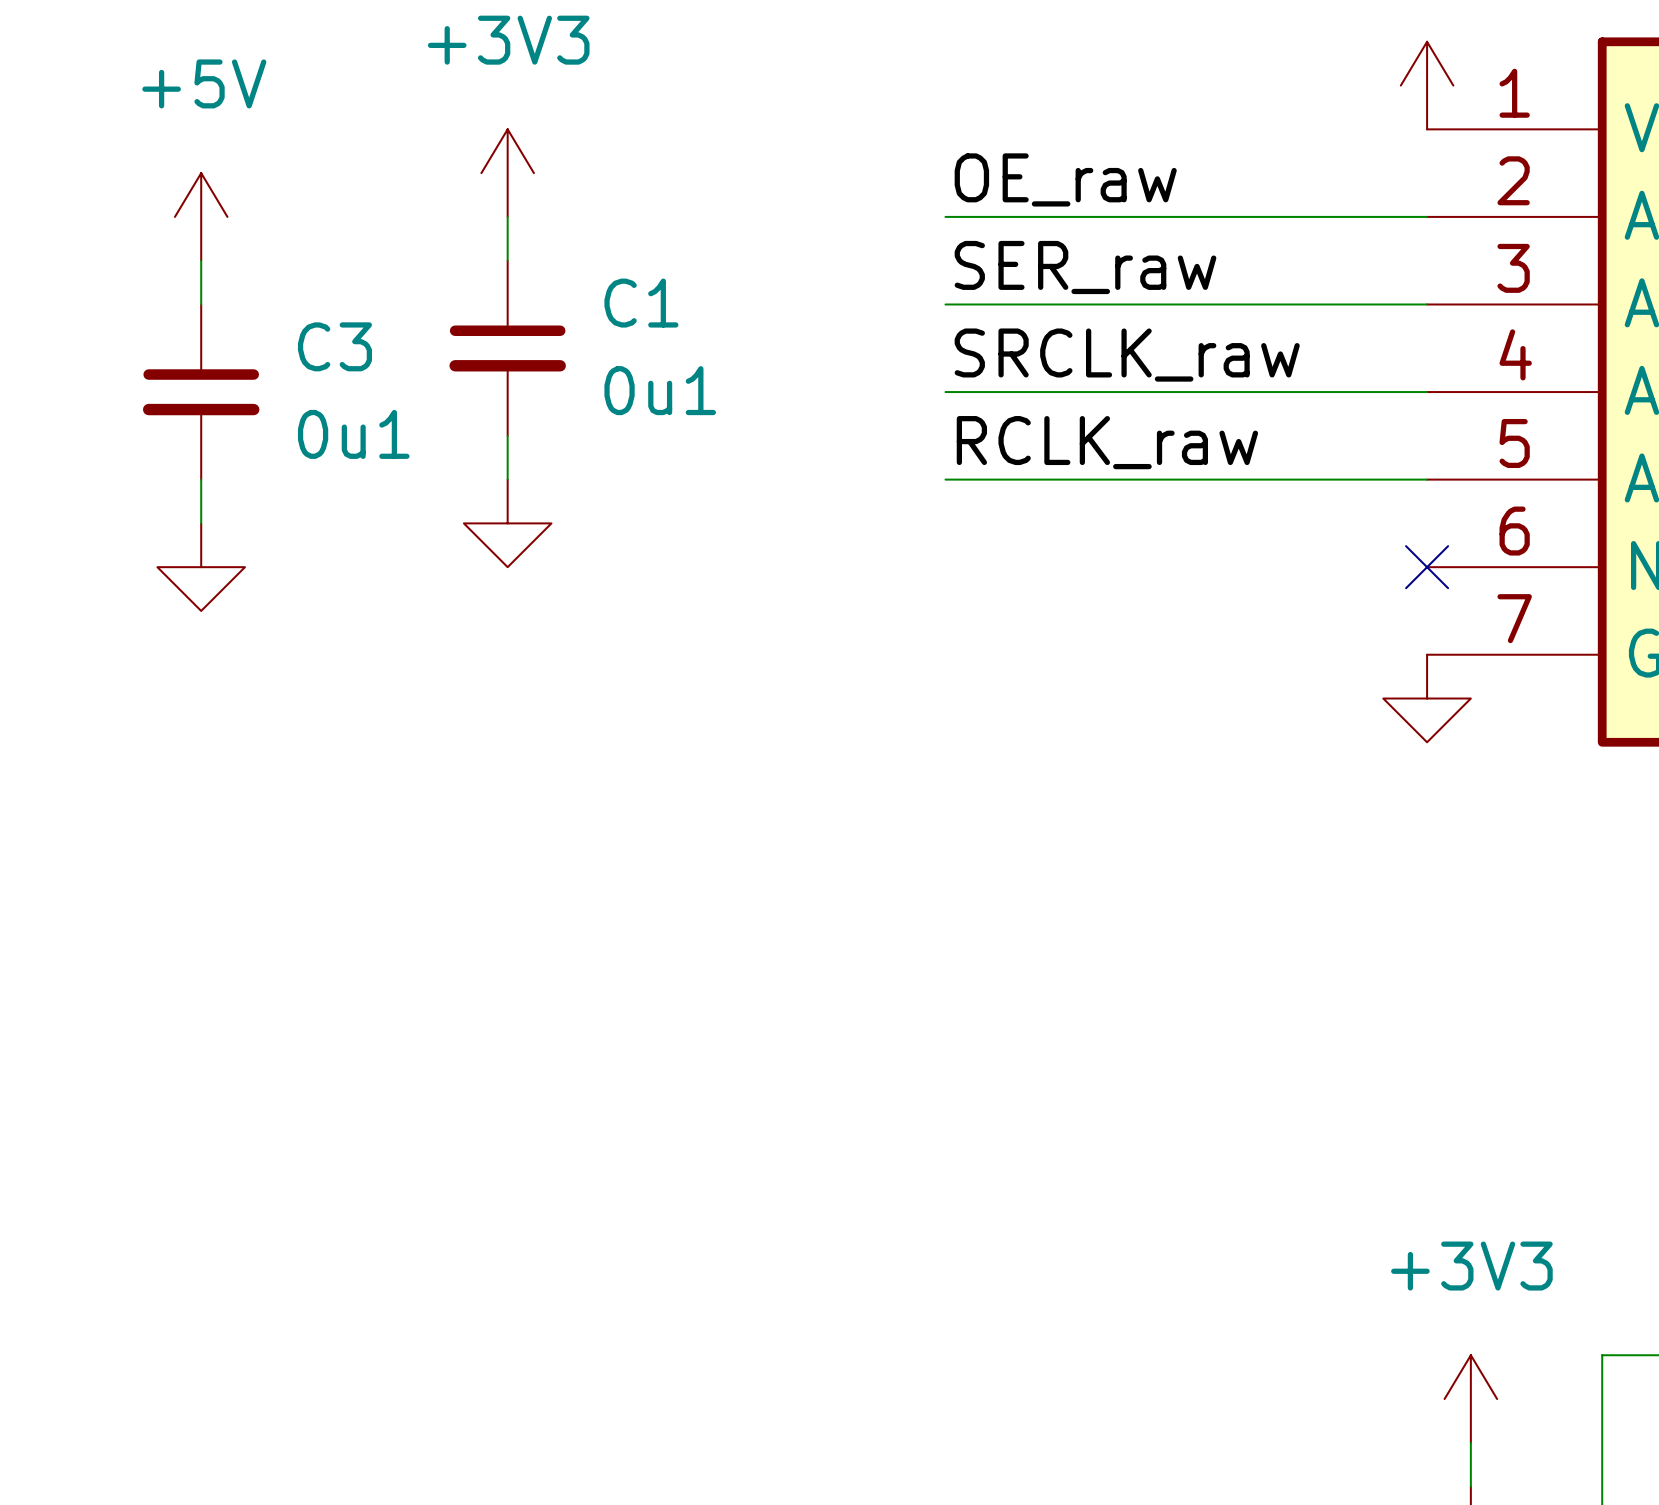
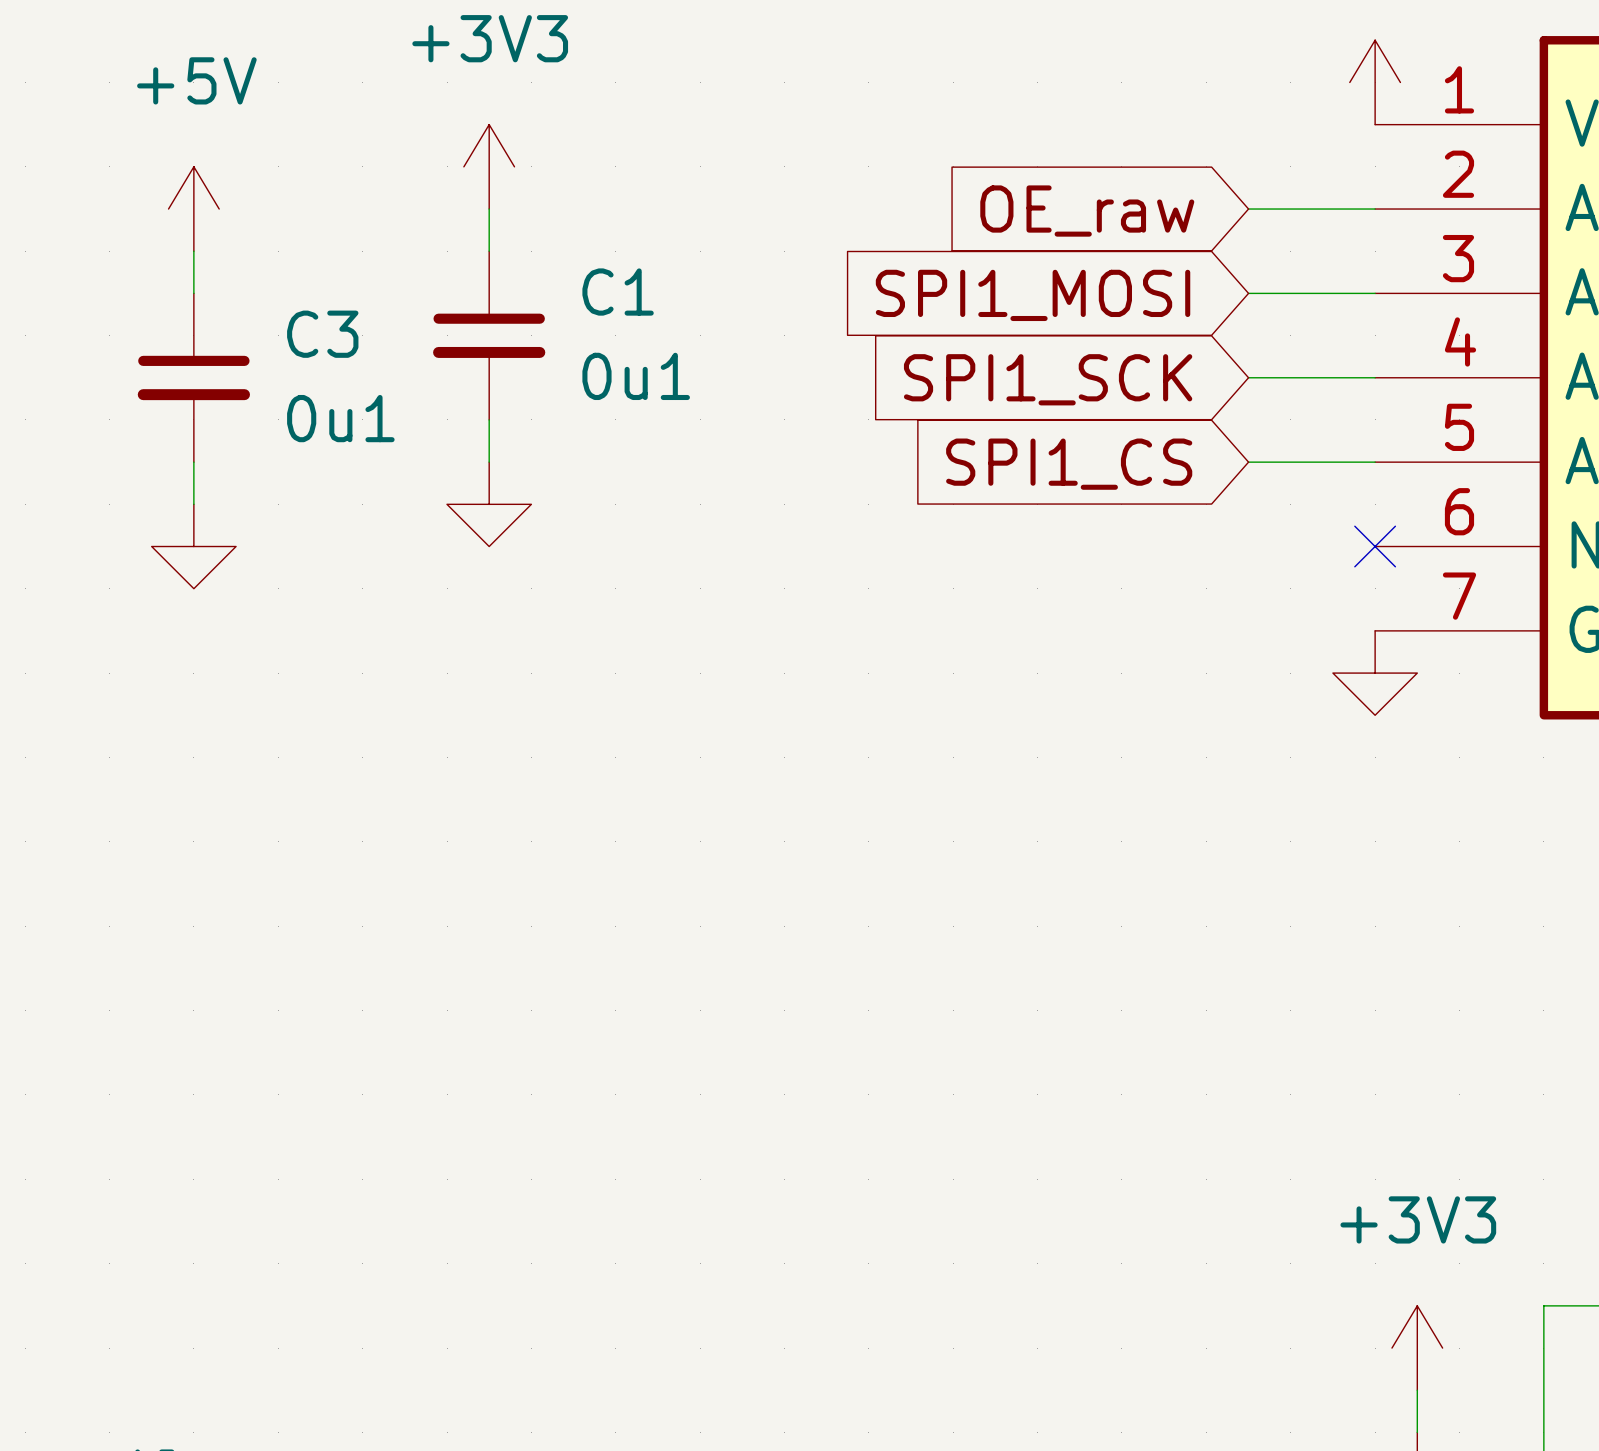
label: OE_raw (1065, 179) -> none
wire: (945, 216) (1295, 216) -> none
global label: none -> OE_raw (1087, 211)
label: SER_raw (1085, 267) -> none
wire: (945, 304) (1295, 304) -> none
global label: none -> SPI1_MOSI (1033, 295)
label: SRCLK_raw (1127, 355) -> none
wire: (945, 392) (1295, 392) -> none
global label: none -> SPI1_SCK (1048, 379)
label: RCLK_raw (1107, 442) -> none
wire: (945, 479) (1295, 479) -> none
global label: none -> SPI1_CS (1069, 464)

